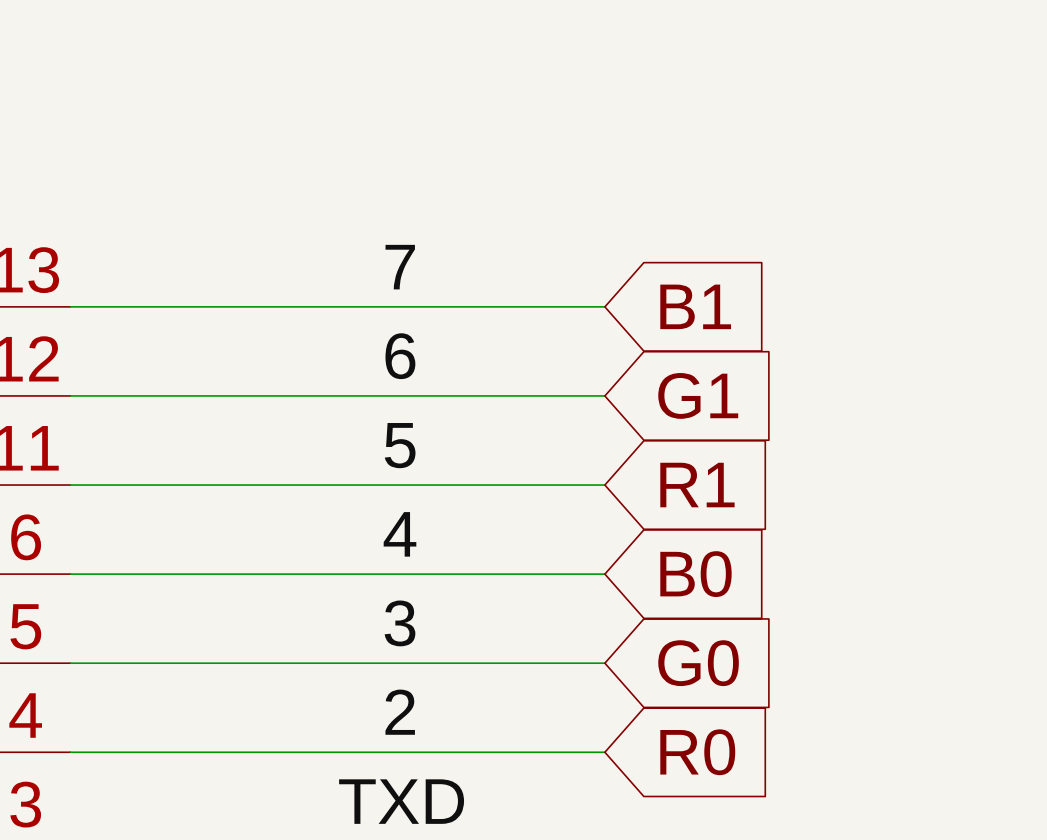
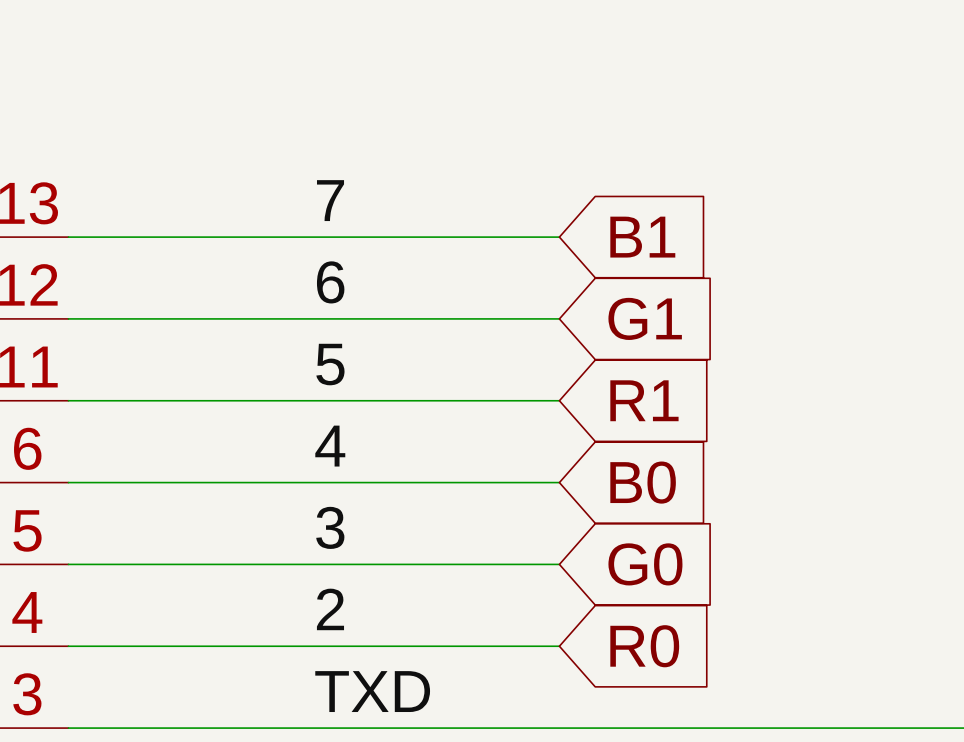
label position: 7 (400, 267) -> 7 (330, 200)
label position: 6 (400, 356) -> 6 (330, 282)
label position: 5 (400, 445) -> 5 (330, 364)
label position: 4 (400, 534) -> 4 (330, 446)
label position: 3 (400, 623) -> 3 (330, 527)
label position: 2 (400, 712) -> 2 (330, 609)

